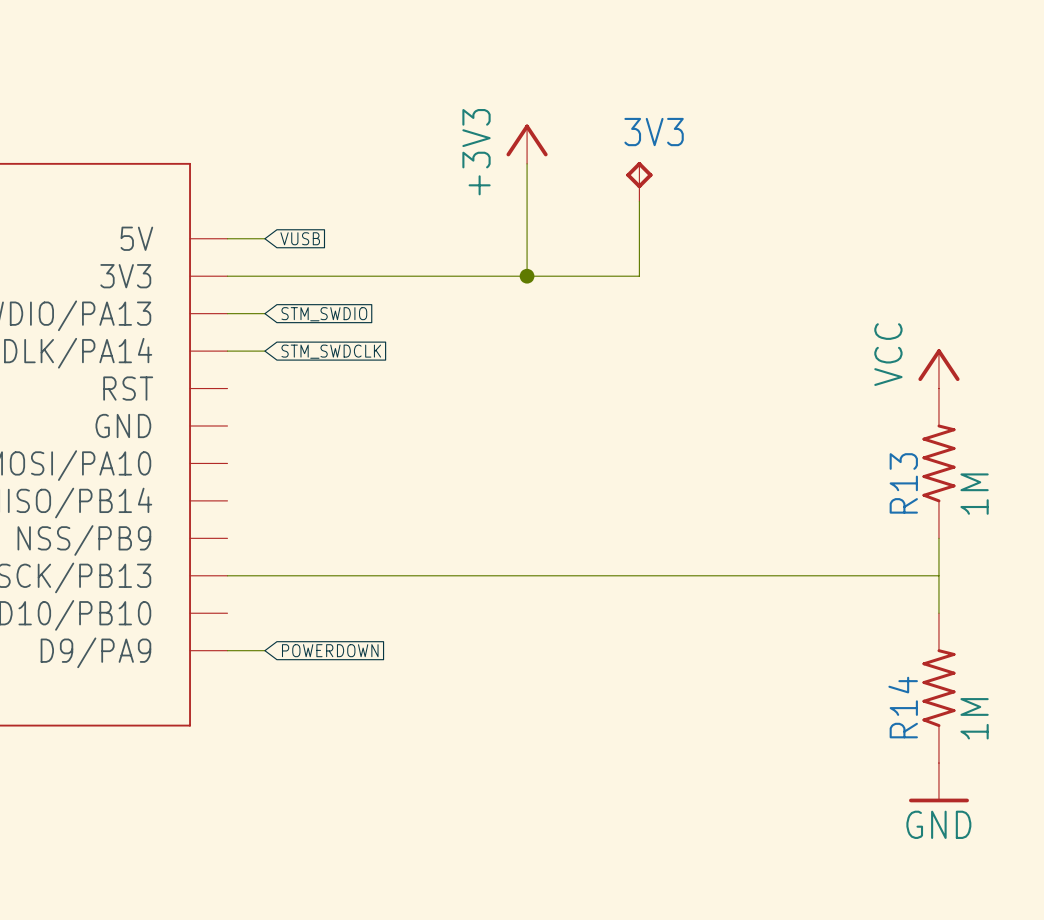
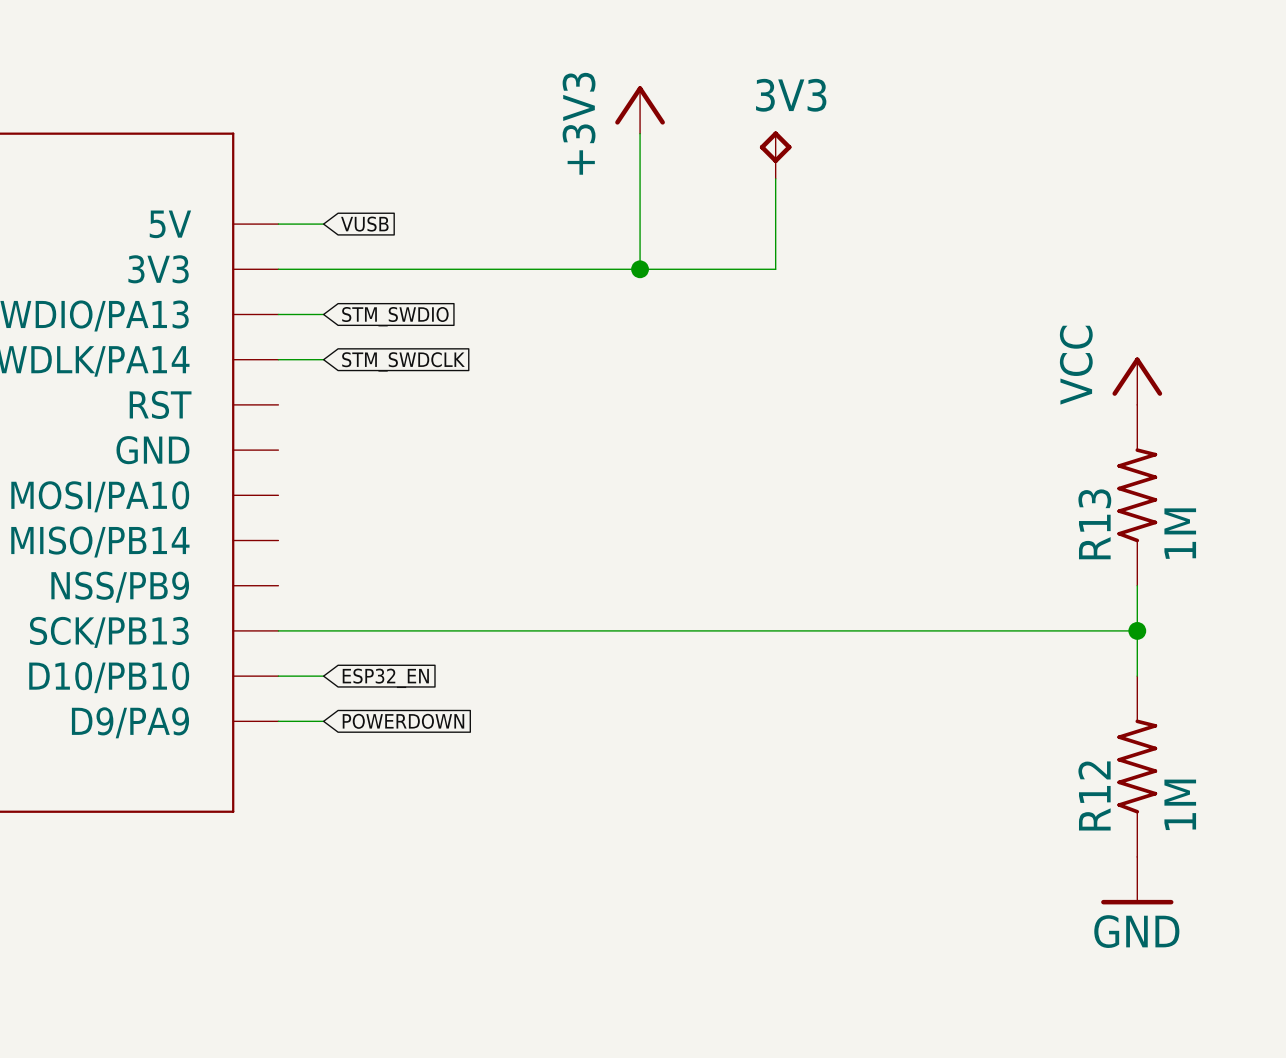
junction: none -> (1137, 630)
wire: none -> (278, 676) (323, 676)
global label: none -> ESP32_EN (385, 678)
R14 name: R14 (903, 707) -> R12 (1094, 795)

